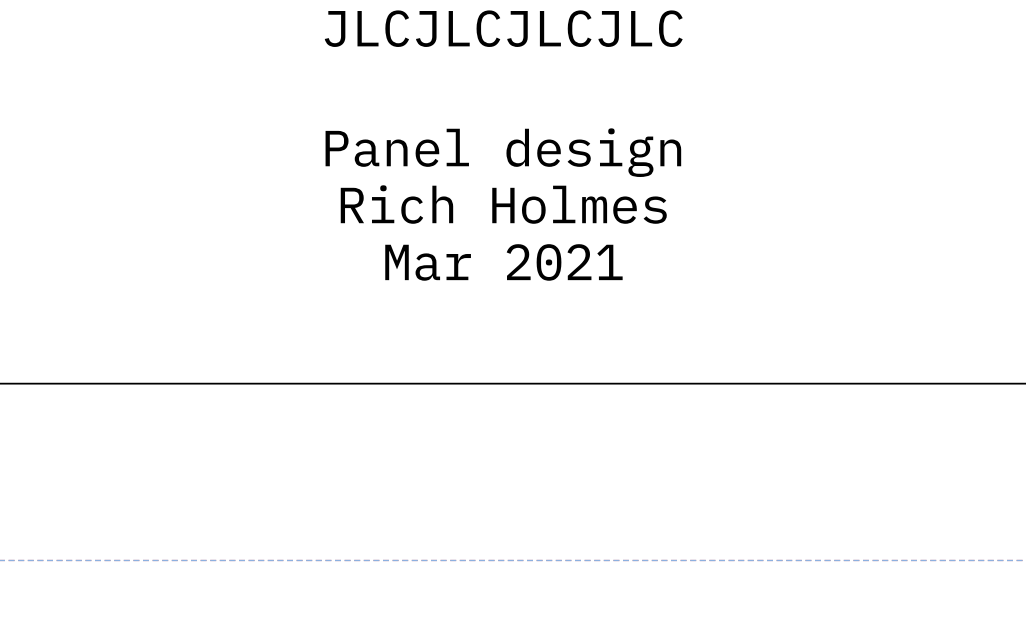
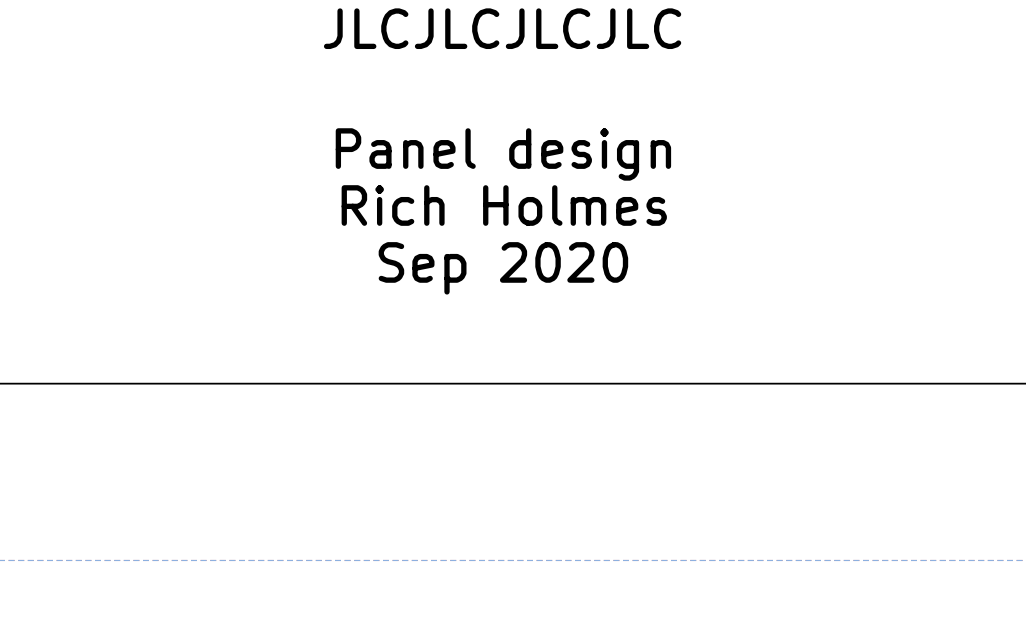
text: Mar 2021 (503, 262) -> Sep 2020 (503, 268)

